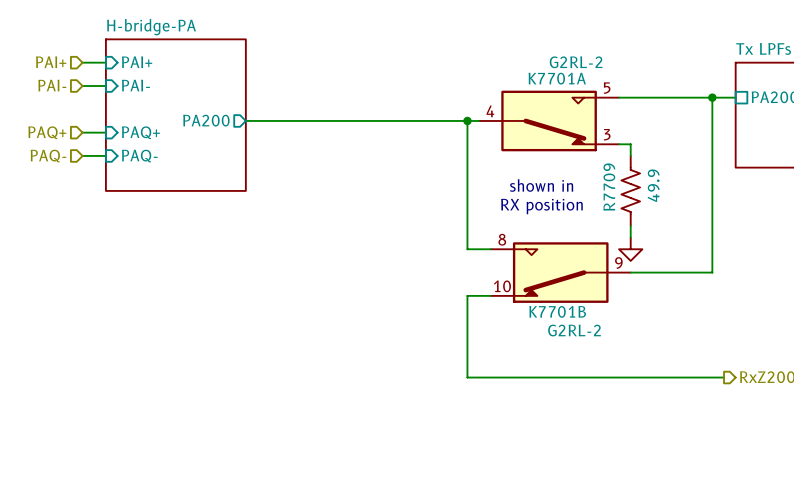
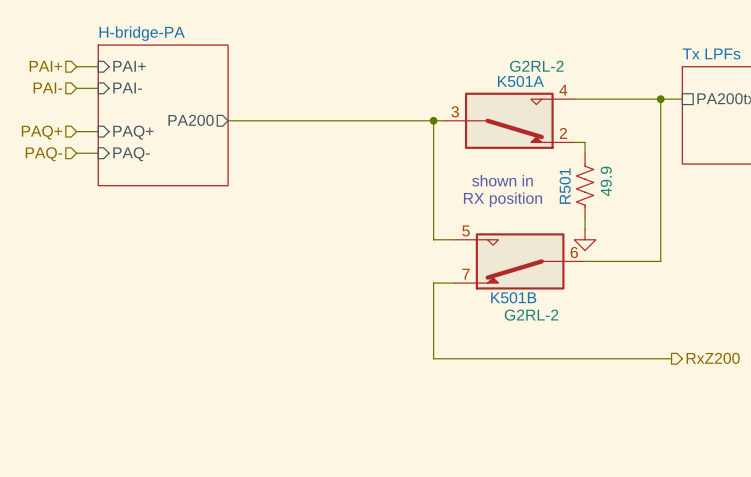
K7701A name: K7701A (557, 78) -> K501A (520, 81)
K7701A pin number: 5 (607, 88) -> 4 (563, 90)
K7701A pin number: 4 (490, 111) -> 3 (455, 111)
K7701A pin number: 3 (607, 134) -> 2 (563, 133)
R7709 name: R7709 (609, 187) -> R501 (565, 186)
K7701B pin number: 8 (502, 239) -> 5 (466, 230)
K7701B pin number: 9 (618, 263) -> 6 (574, 252)
K7701B pin number: 10 (502, 286) -> 7 (466, 274)
K7701B name: K7701B (557, 311) -> K501B (513, 297)

